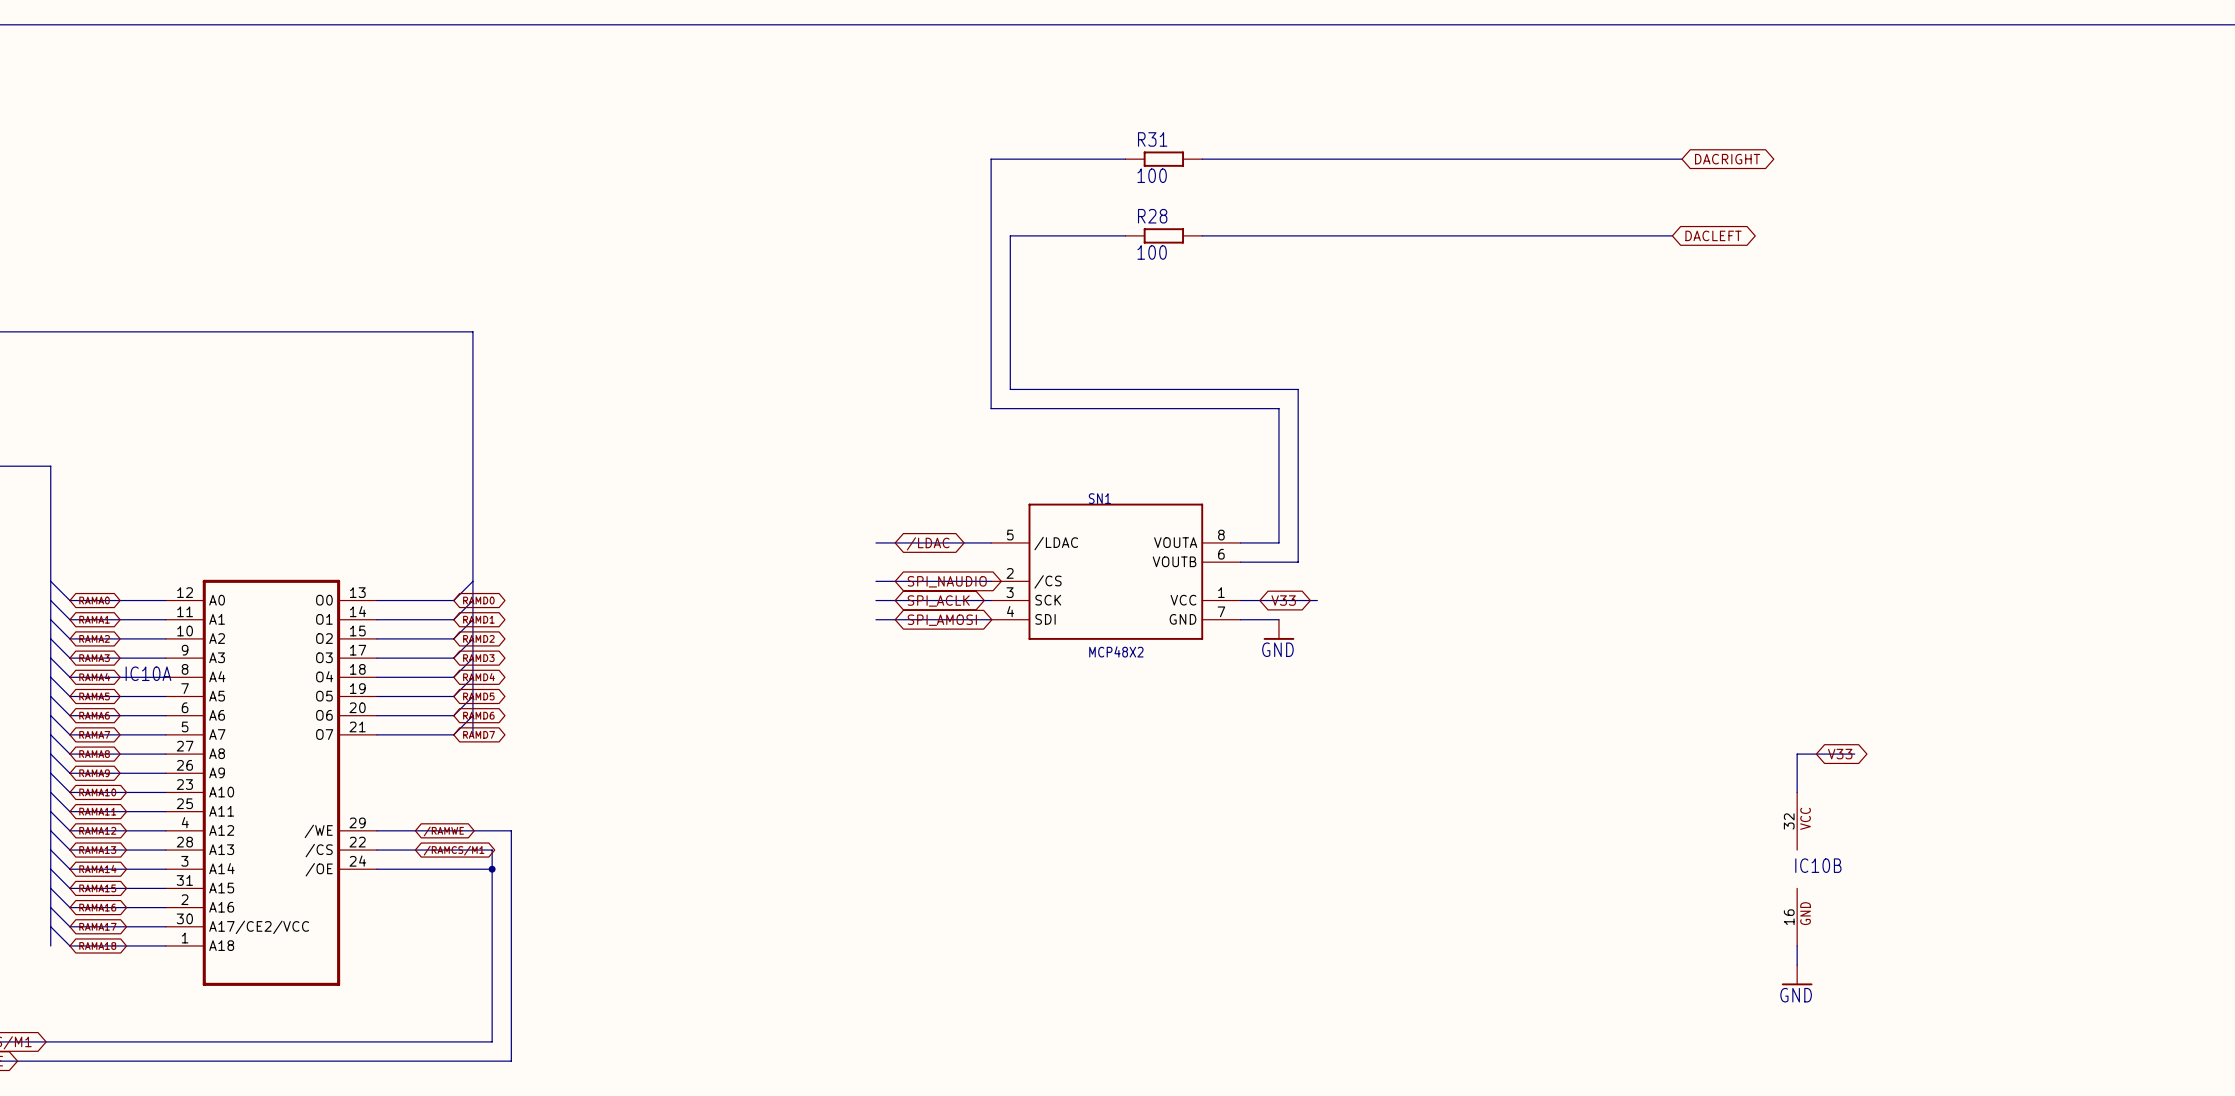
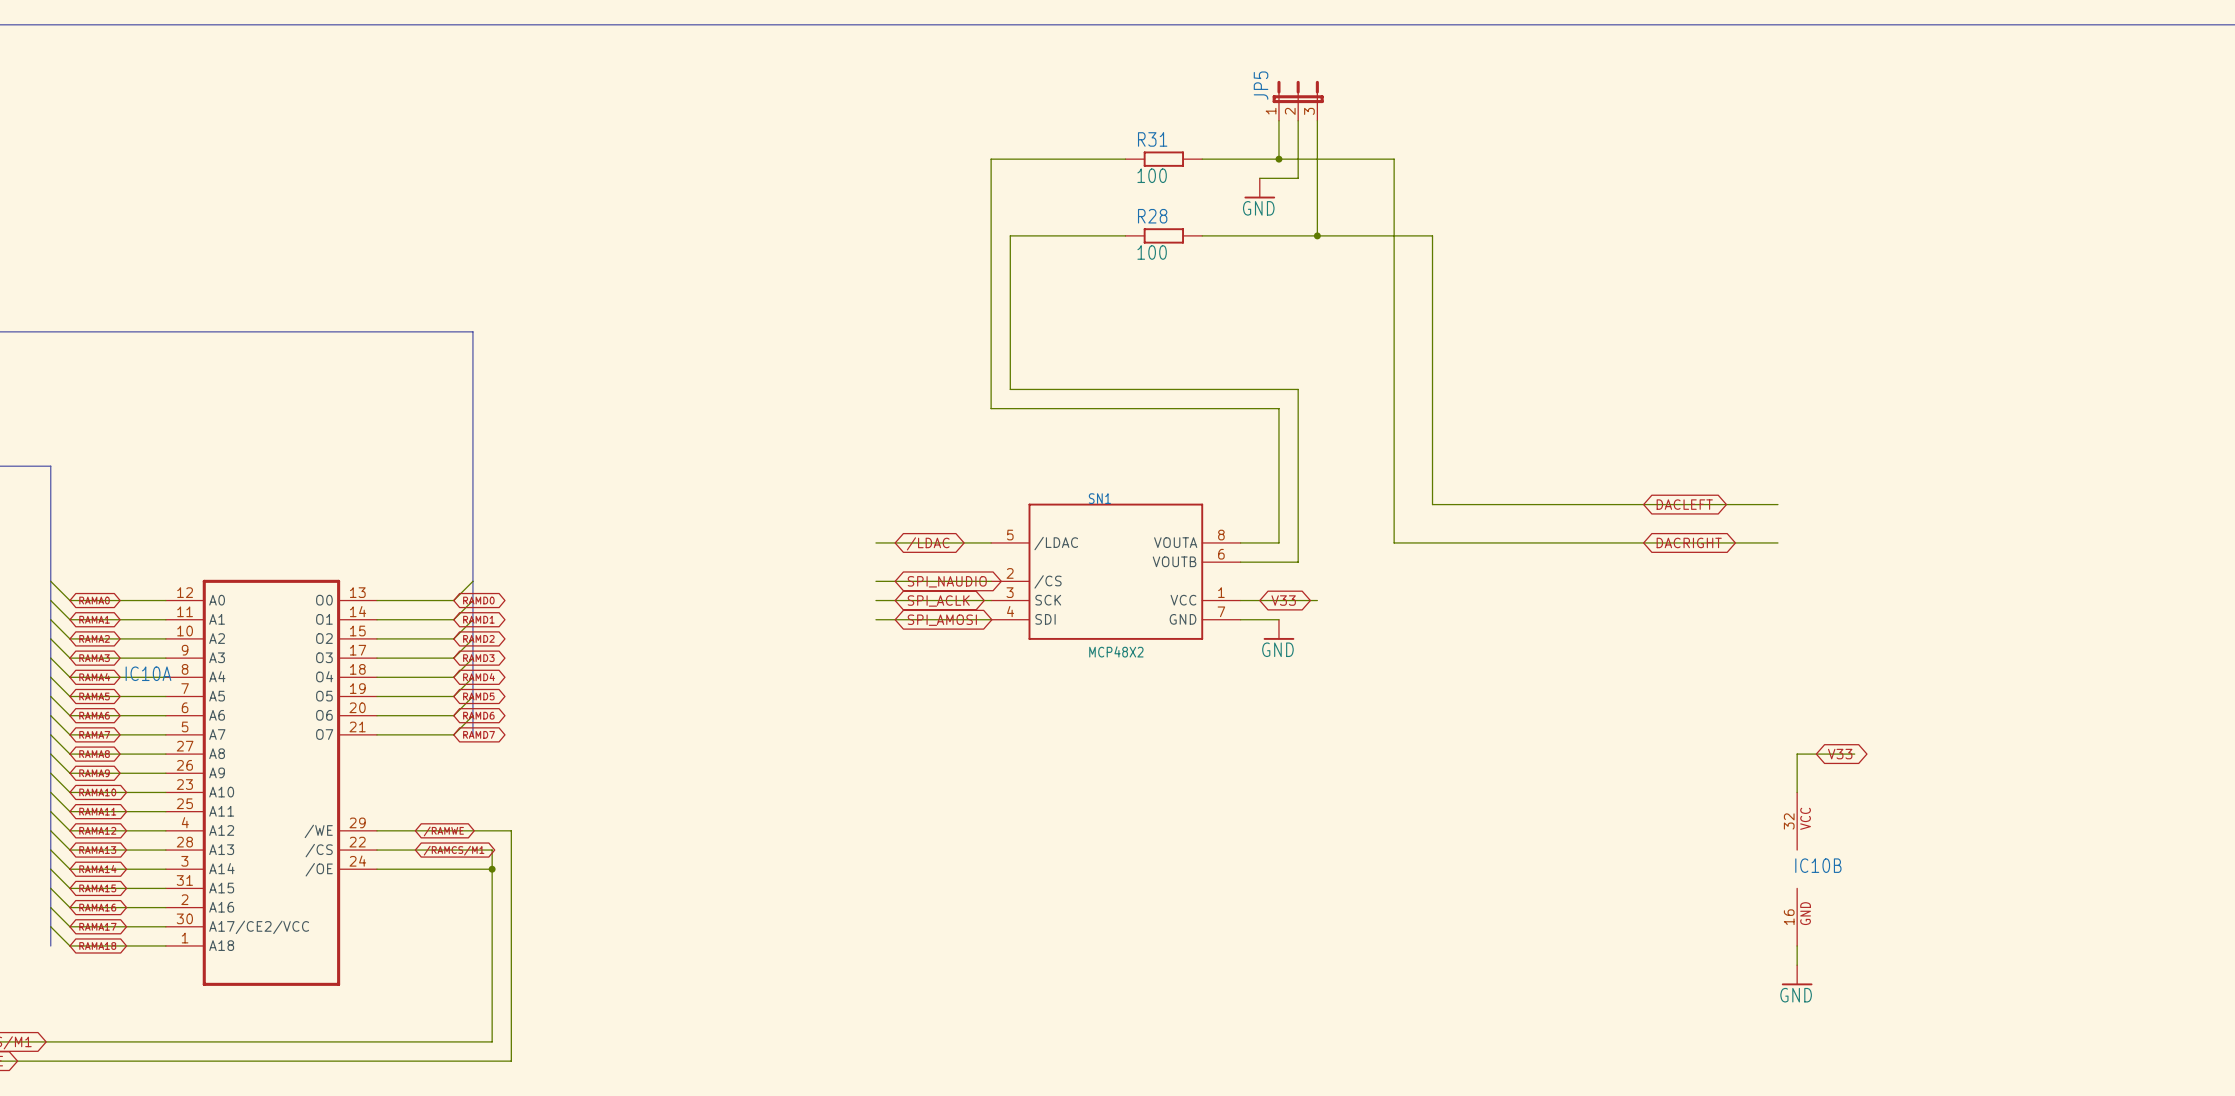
JP5: none -> (1298, 100)
wire: none -> (1278, 120) (1278, 159)
wire: none -> (1298, 120) (1298, 178) (1259, 178)
wire: none -> (1317, 120) (1317, 235)
junction: none -> (1278, 159)
wire: (1394, 159) (1682, 159) -> (1394, 159) (1394, 542) (1777, 542)
global label: DACRIGHT (1727, 159) -> none
power symbol: none -> GND (1259, 188)
junction: none -> (1317, 235)
wire: (1432, 235) (1672, 235) -> (1432, 235) (1432, 504) (1777, 504)
global label: DACLEFT (1713, 235) -> none
global label: none -> DACLEFT (1684, 504)
global label: none -> DACRIGHT (1689, 542)

